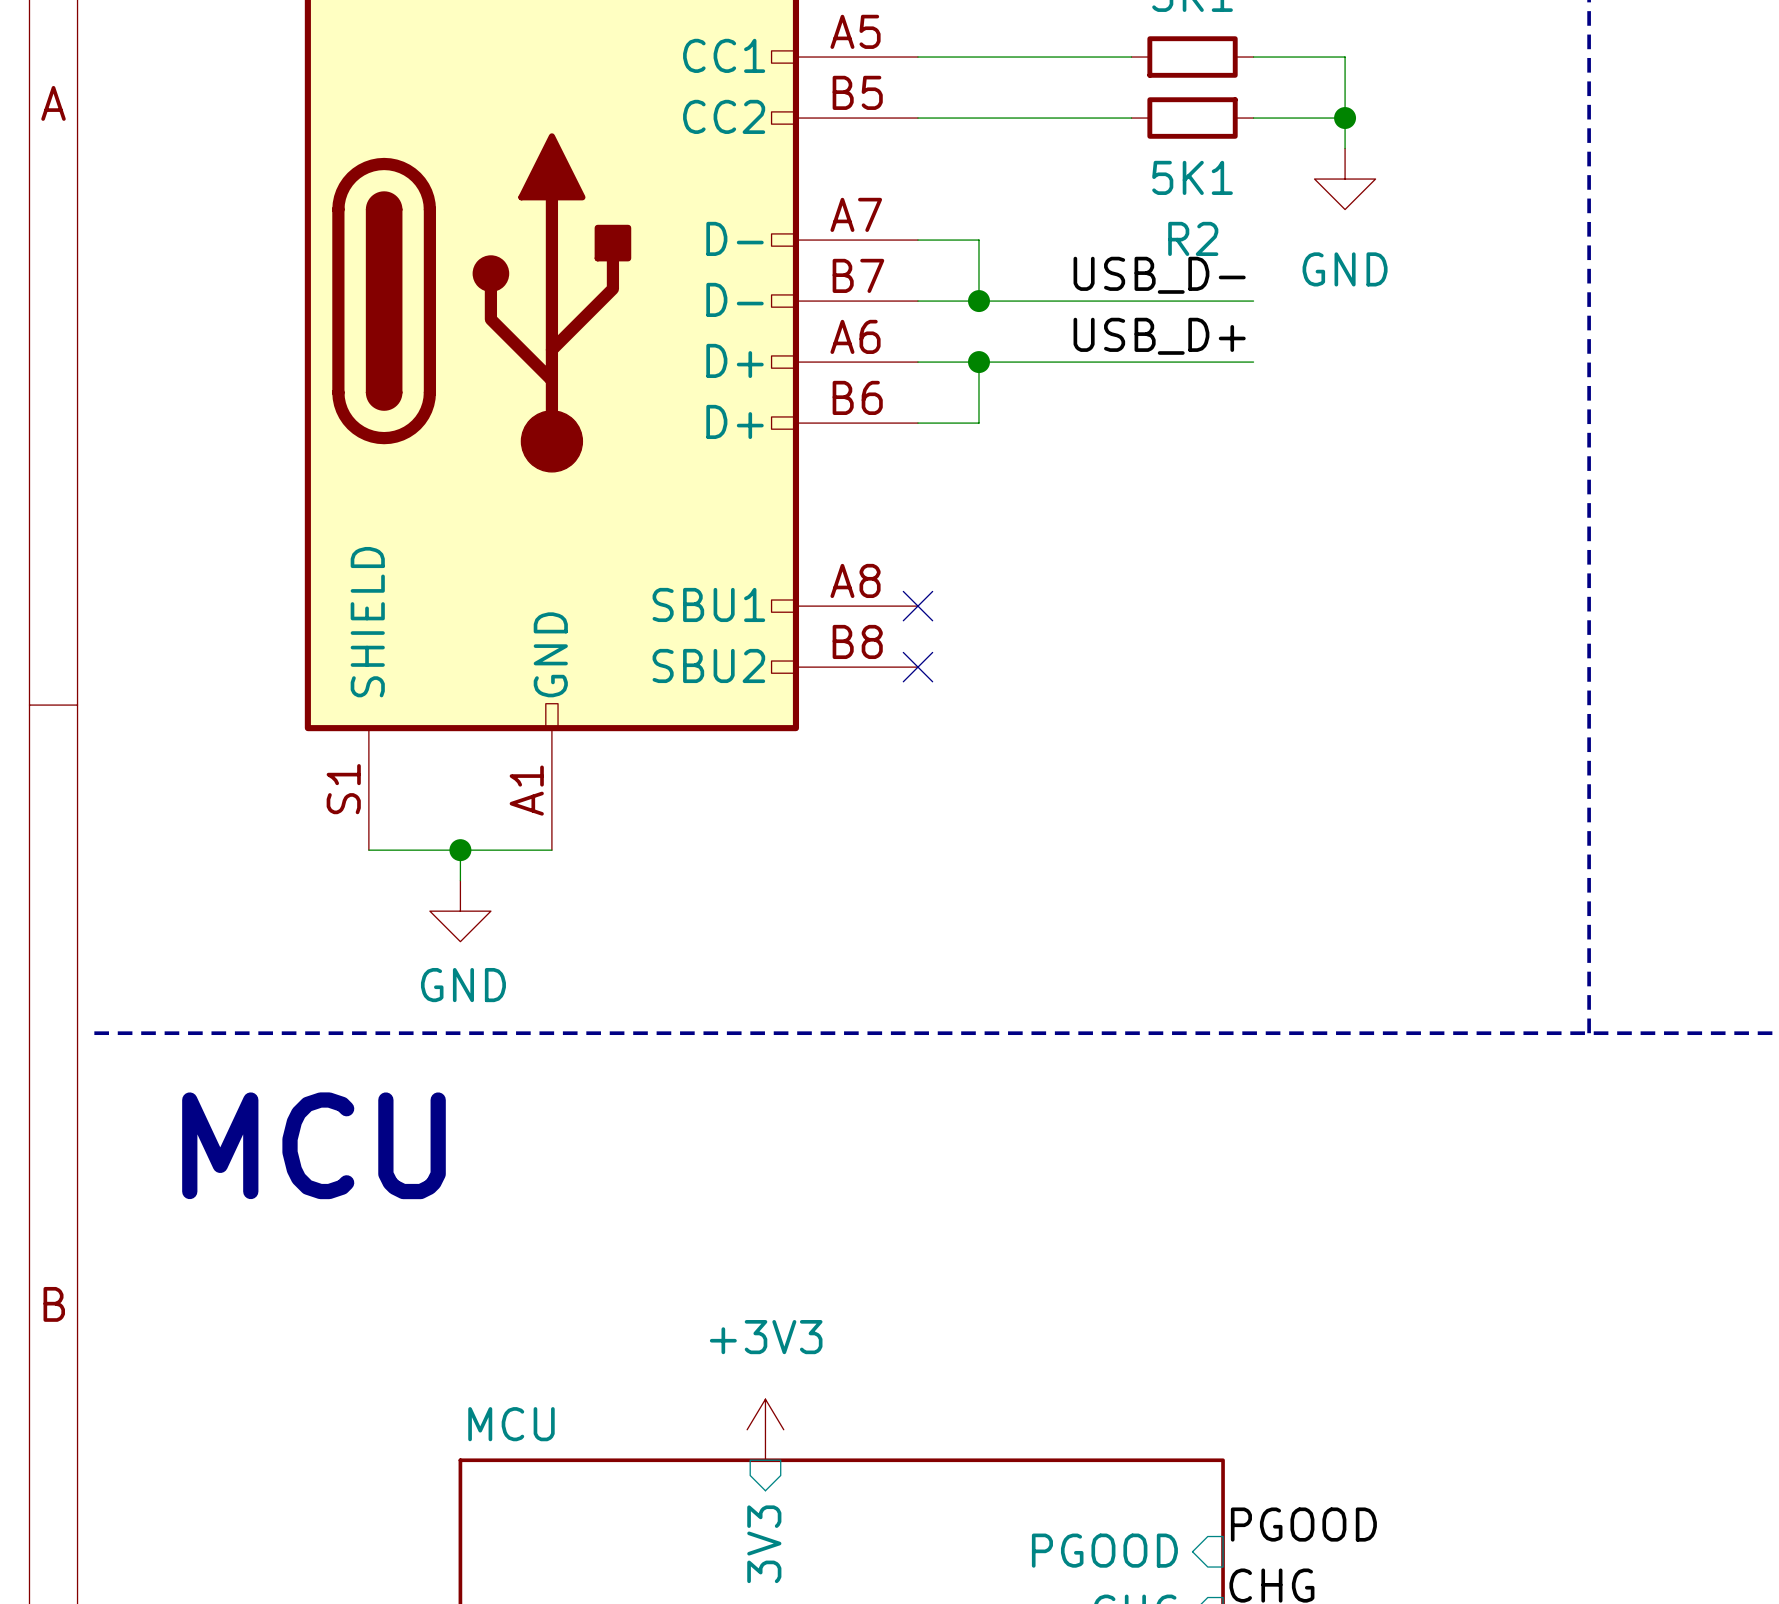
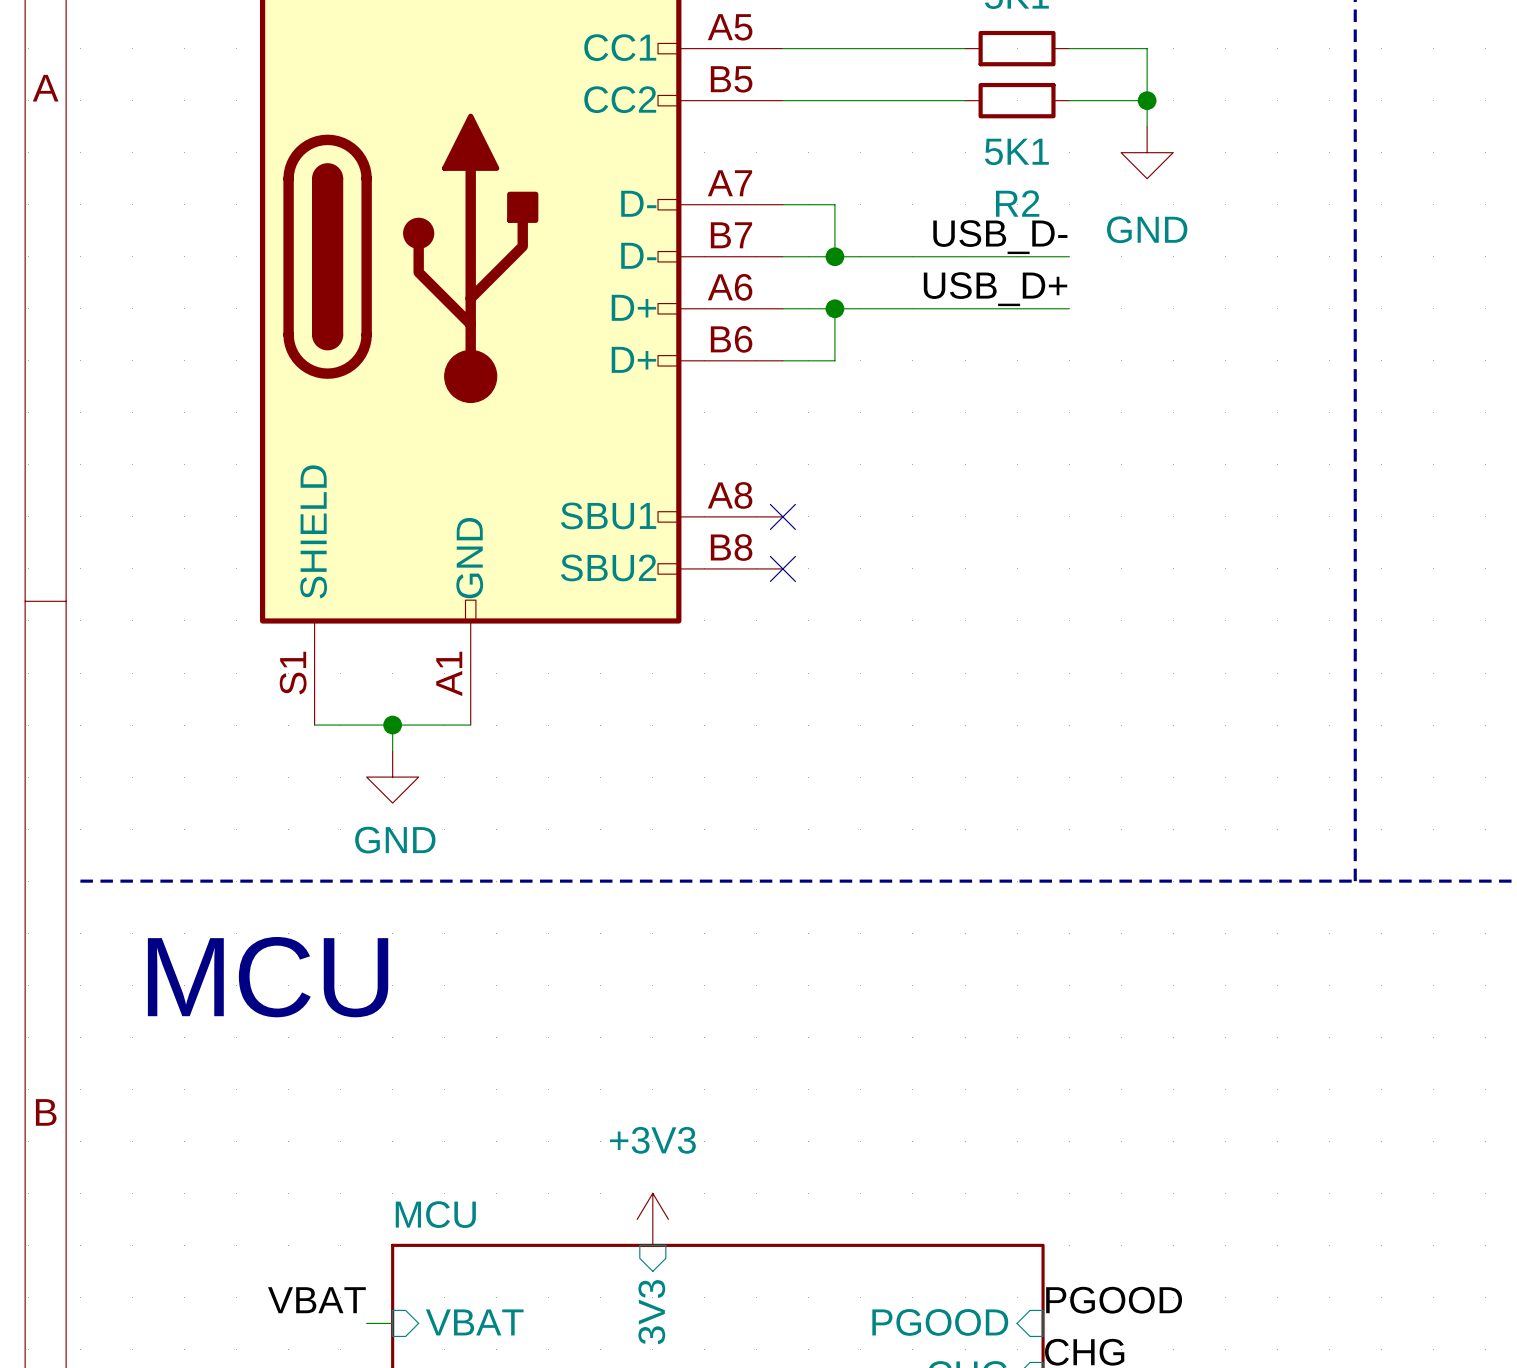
label: none -> VBAT (316, 1300)
sheet pin: none -> VBAT (474, 1322)
wire: none -> (366, 1323) (392, 1323)

